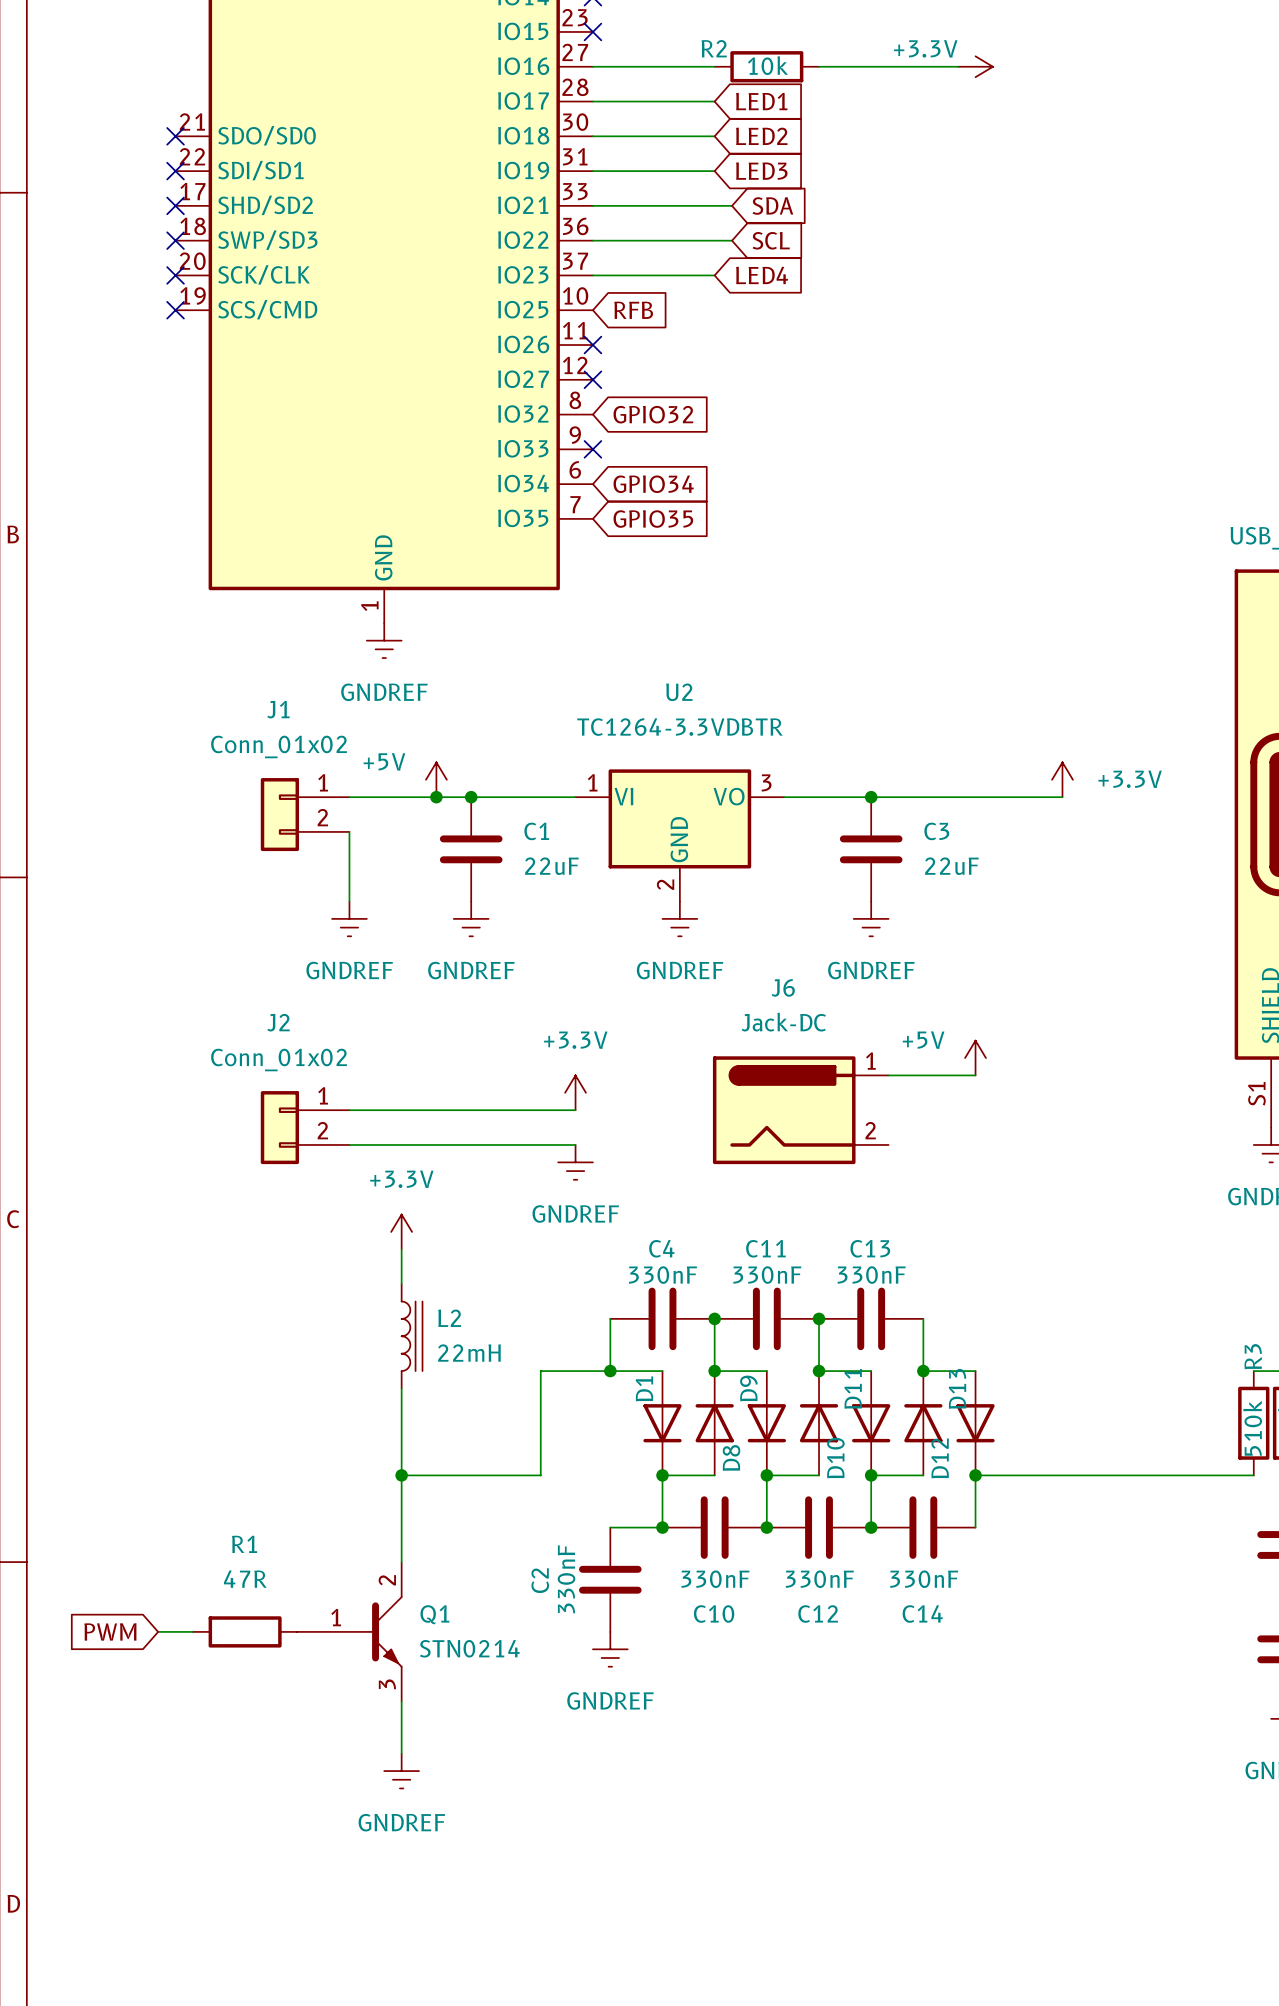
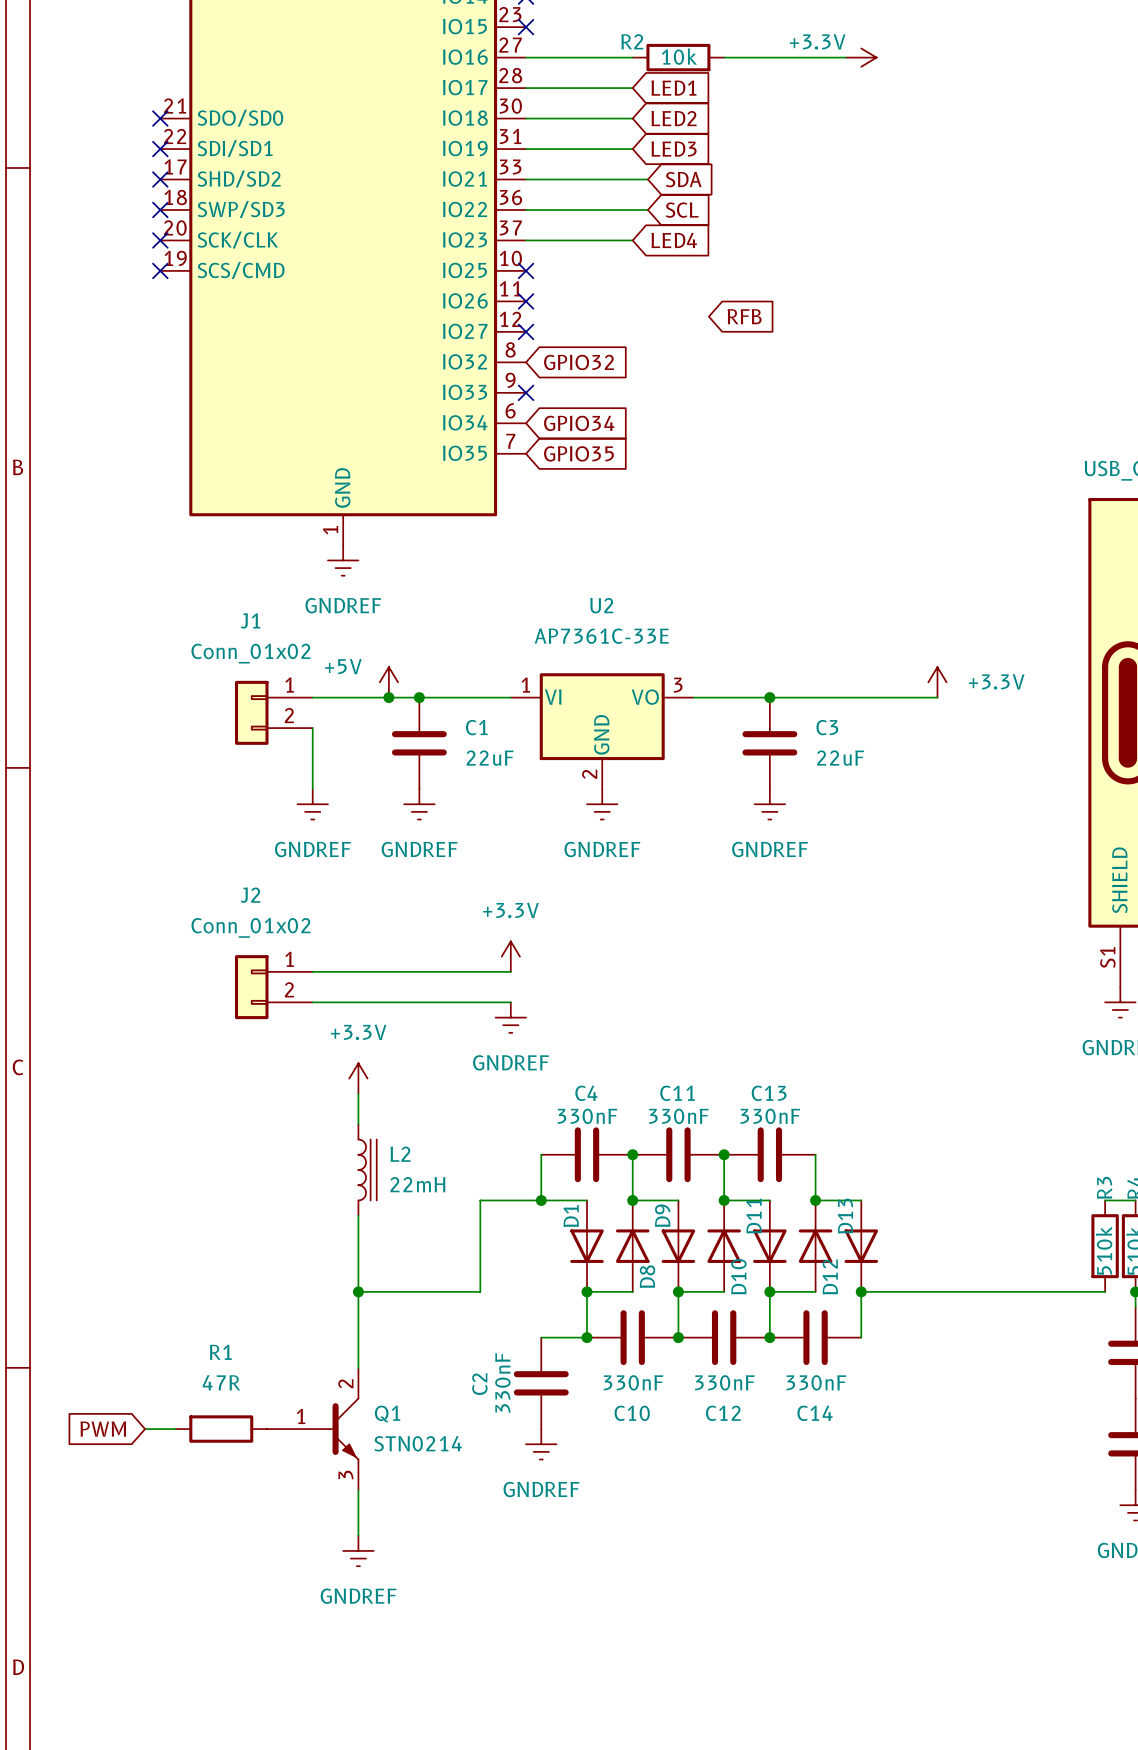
no-connect mark: none -> (526, 270)
global label position: RFB (633, 310) -> RFB (744, 316)
U2 value: TC1264-3.3VDBTR (679, 727) -> AP7361C-33E (601, 636)
power symbol: +5V (975, 1058) -> none
wire: (888, 1075) (975, 1075) -> none
J6: Jack-DC (800, 1110) -> none

